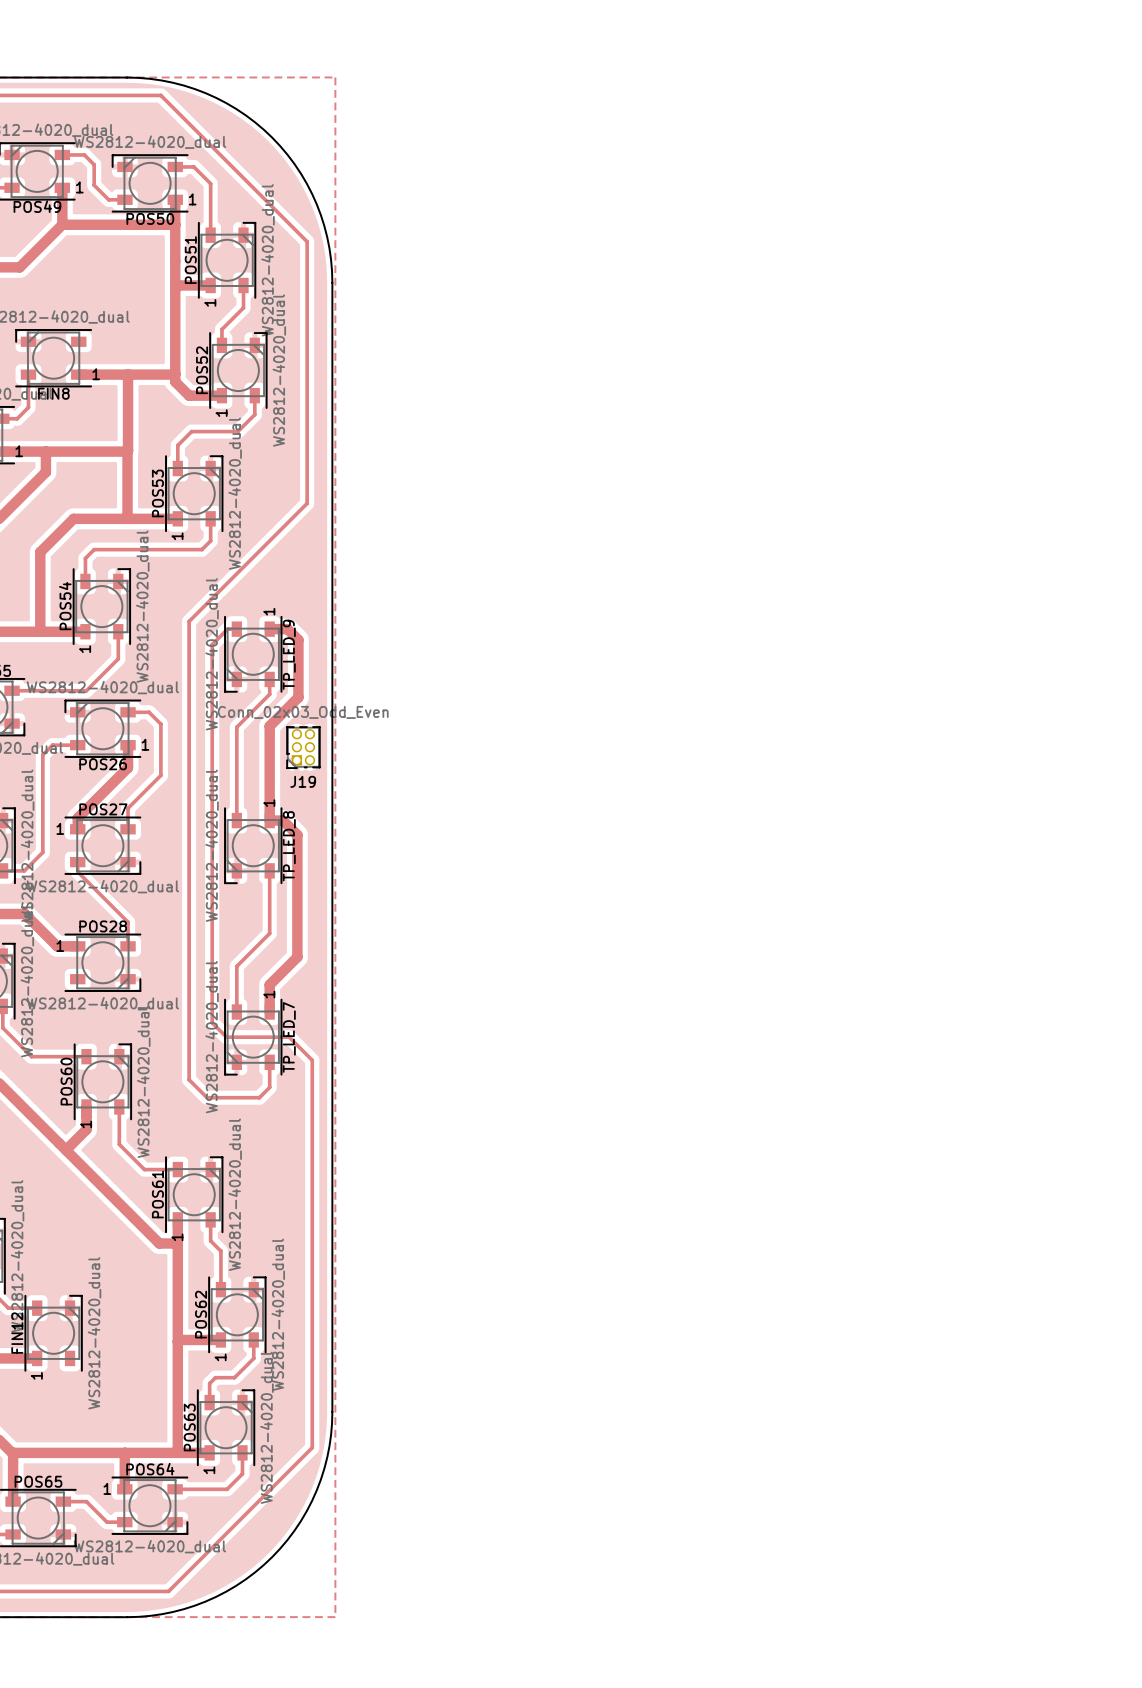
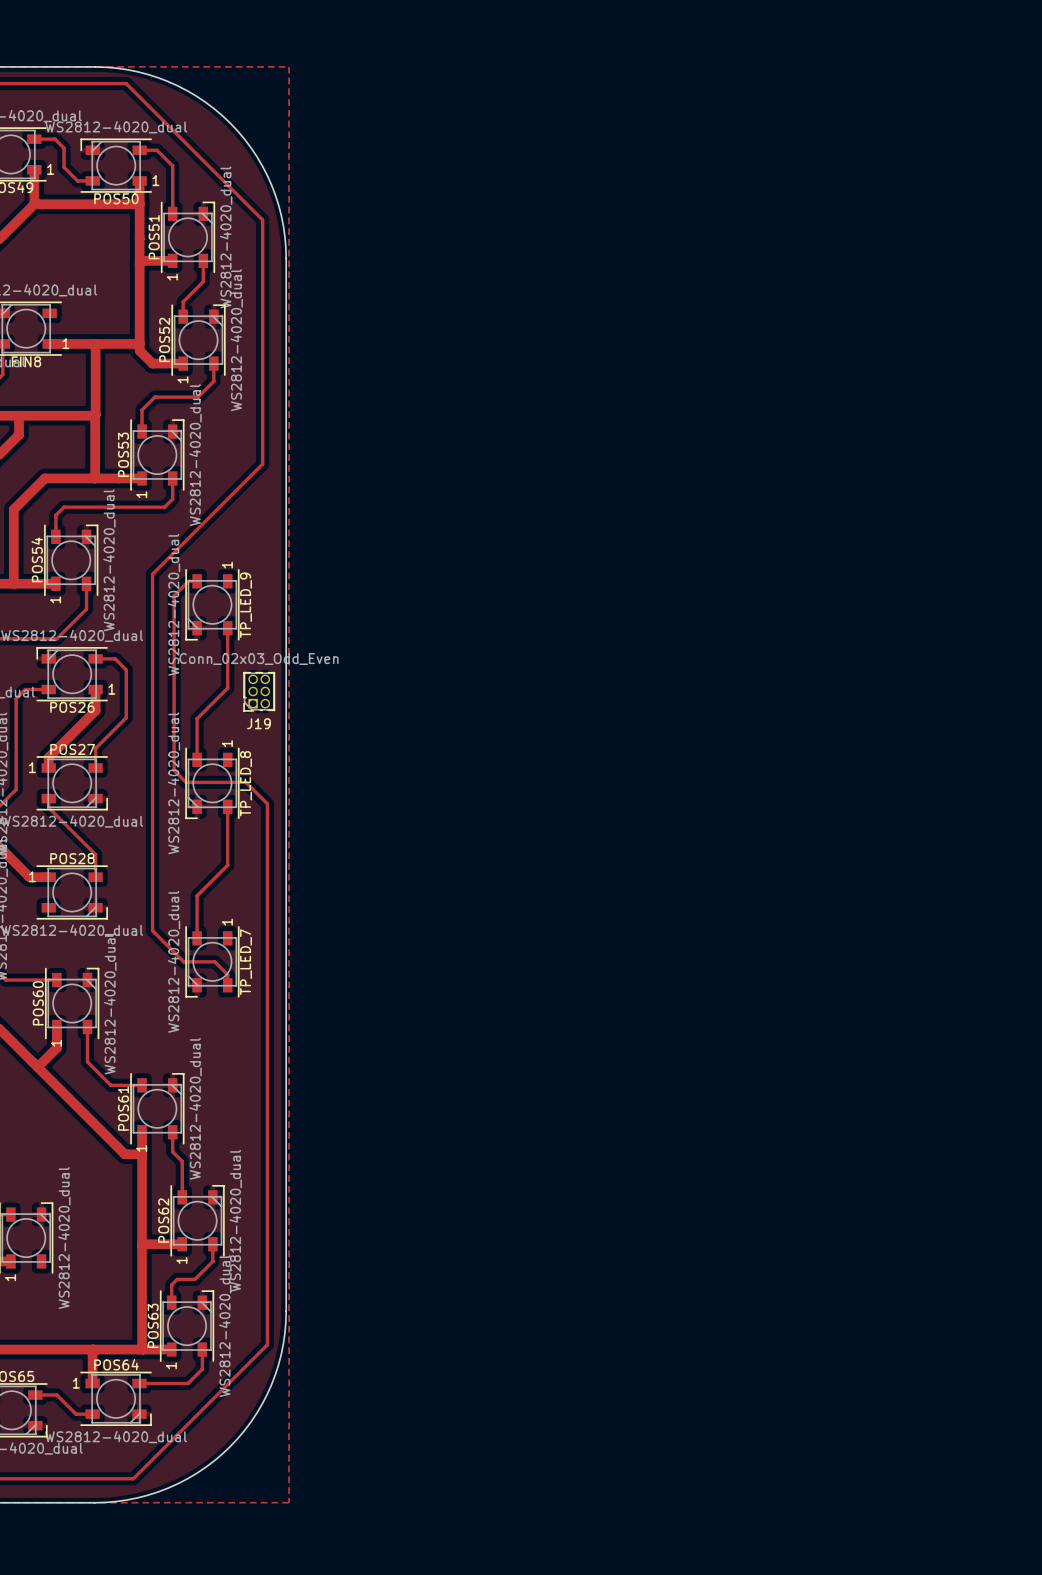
top track: (269, 629) (287, 629) (298, 639) (298, 697) (269, 726) -> (227, 642) (227, 671)
top track: (269, 694) (236, 727) (236, 776) -> (227, 688) (197, 718)
top track width: thick (269, 726) (269, 743) -> thin (227, 671) (227, 688)
top track: (269, 743) (269, 820) (282, 820) (297, 834) (297, 957) (269, 984) (269, 1011) -> none
top track: (212, 831) (212, 1022) (226, 1037) -> (174, 770) (186, 782) (245, 782) (267, 803) (267, 983)
top track: (189, 1003) (189, 1079) (207, 1097) (259, 1097) (269, 1087) (269, 1062) -> (152, 930) (183, 961) (187, 961)
top track: (255, 1037) (289, 1037) (312, 1060) -> (214, 961) (227, 974) (227, 985)

